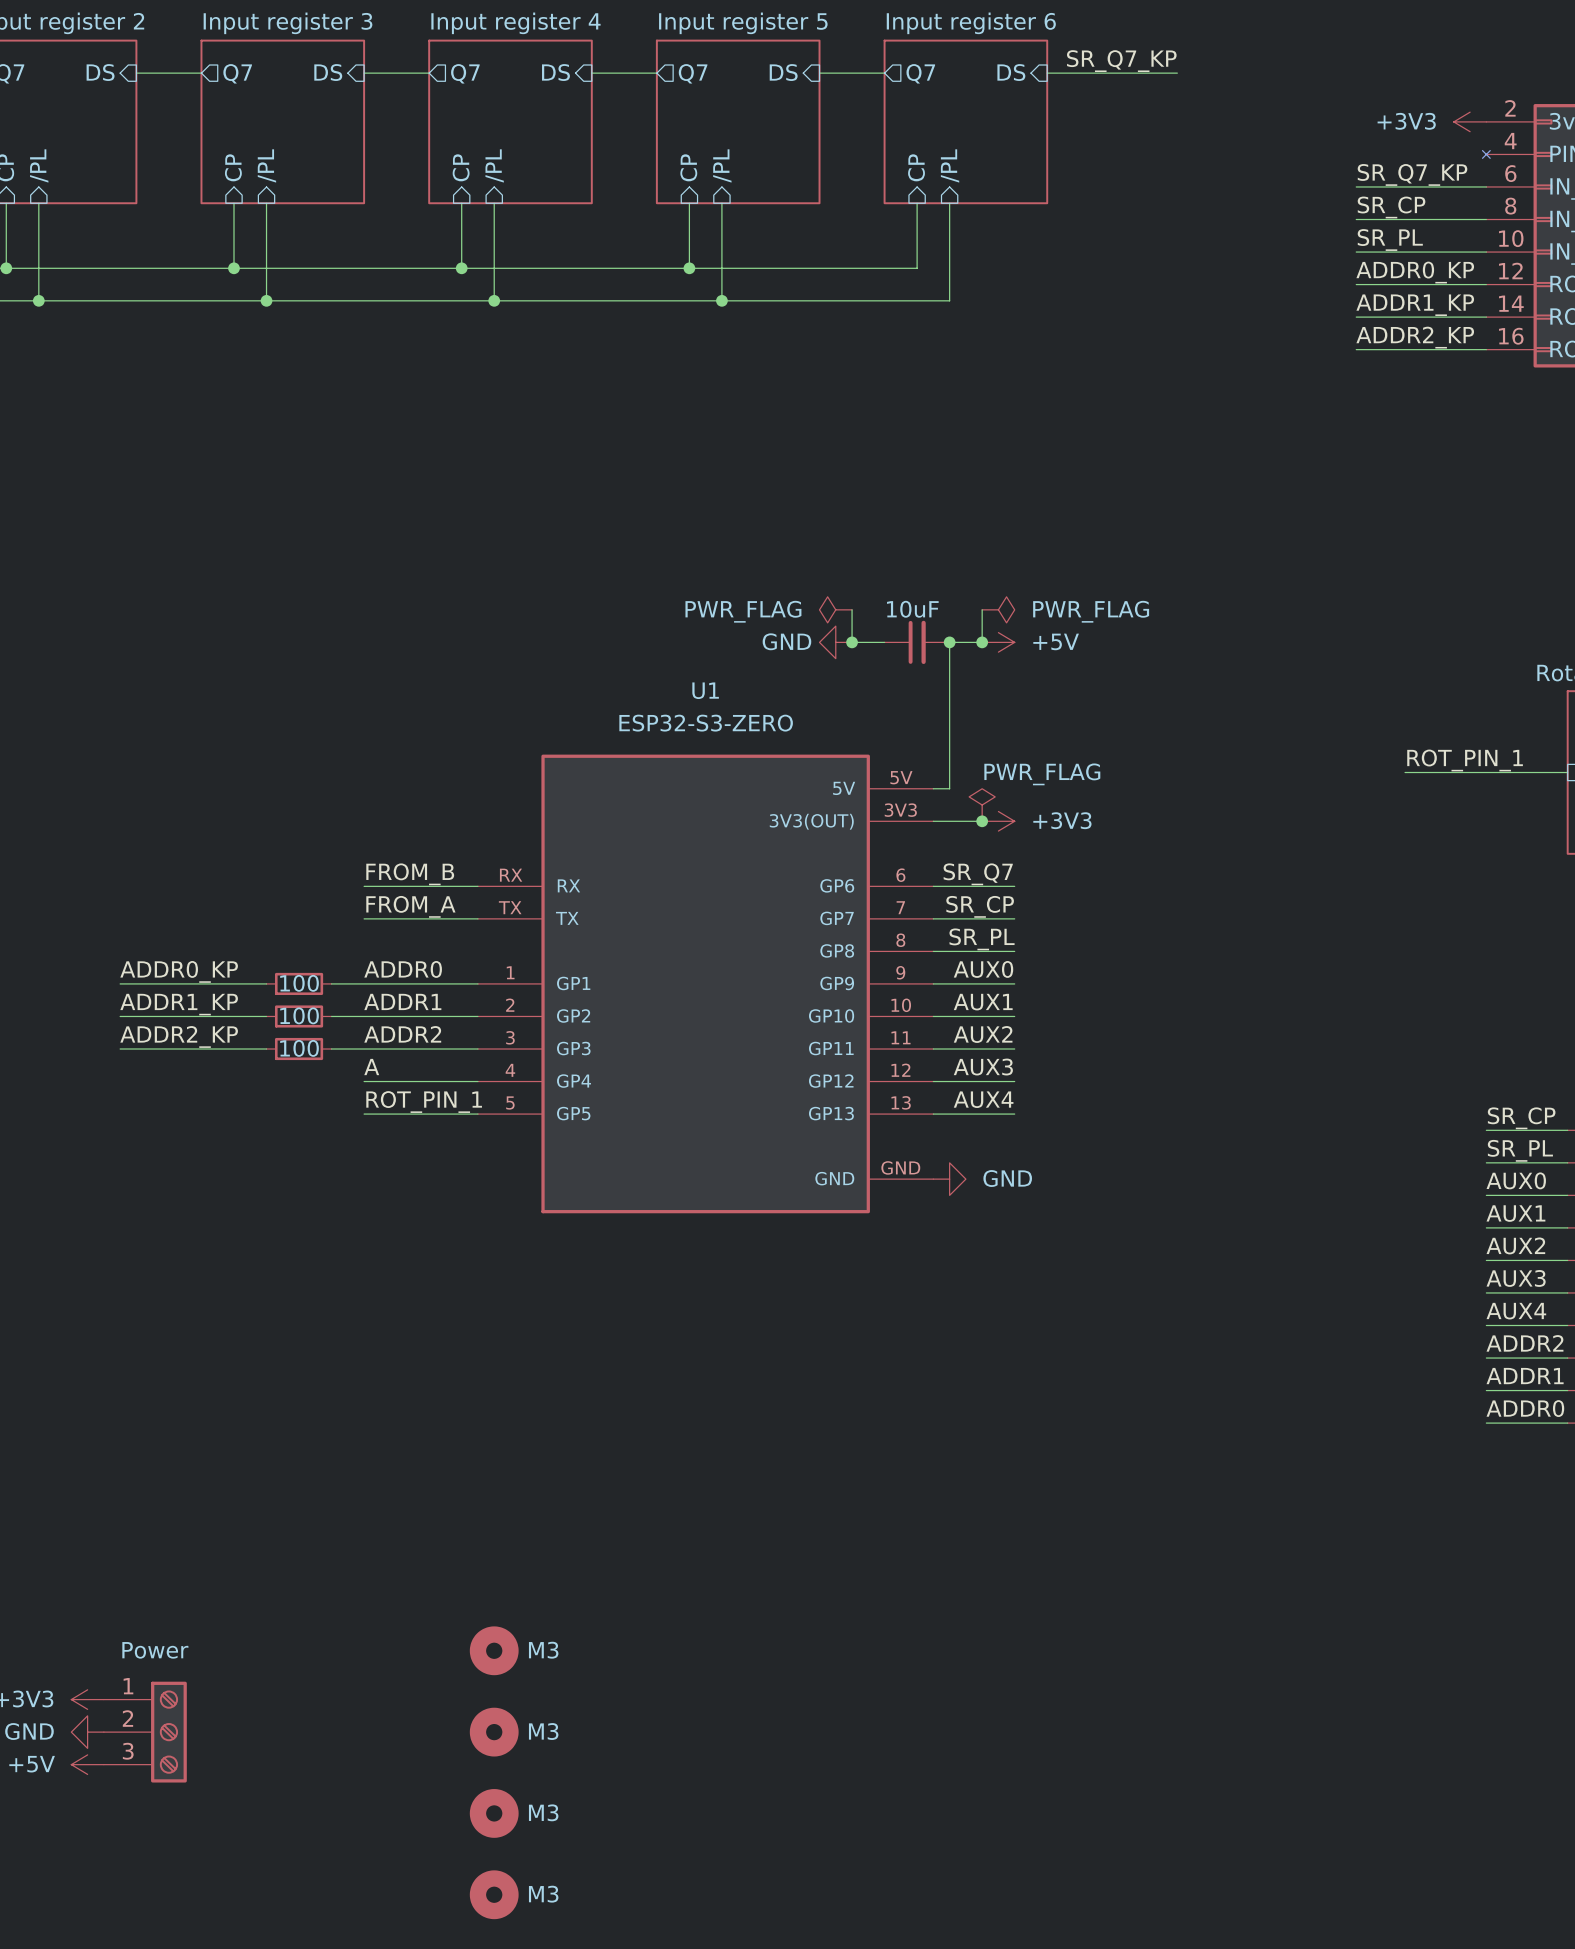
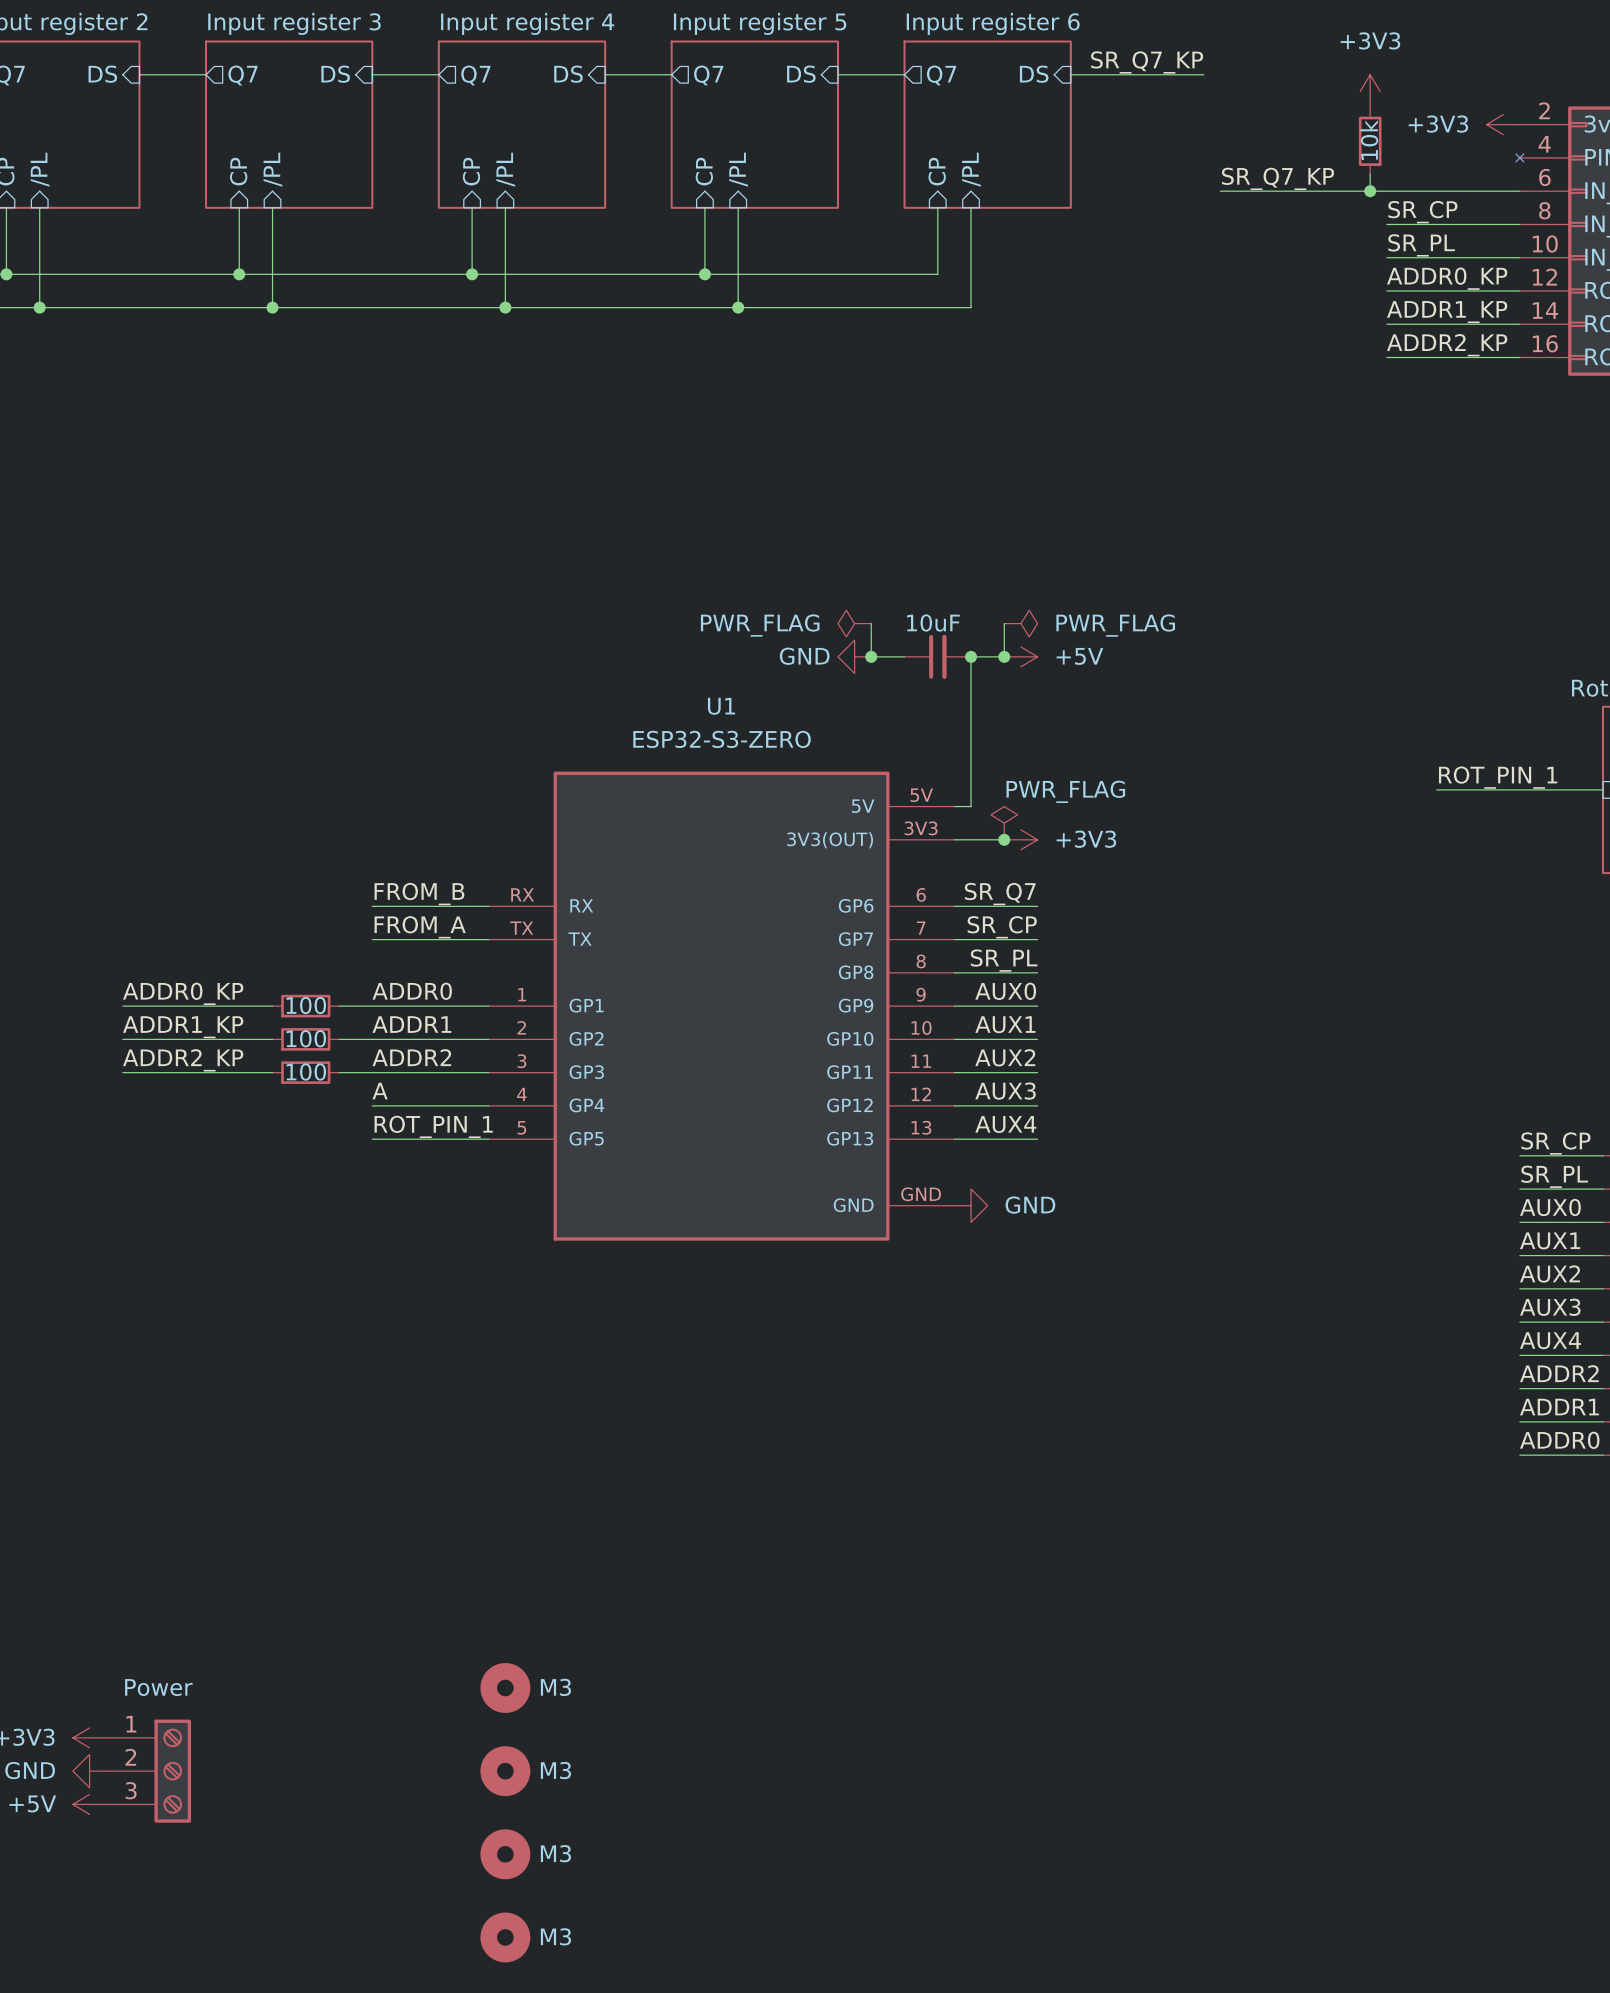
power symbol: none -> +3V3 (1370, 91)
part: none -> 10k (1370, 141)
wire: none -> (1370, 174) (1370, 191)
label position: SR_Q7_KP (1412, 174) -> SR_Q7_KP (1278, 178)
wire: none -> (1220, 191) (1386, 191)
junction: none -> (1370, 191)

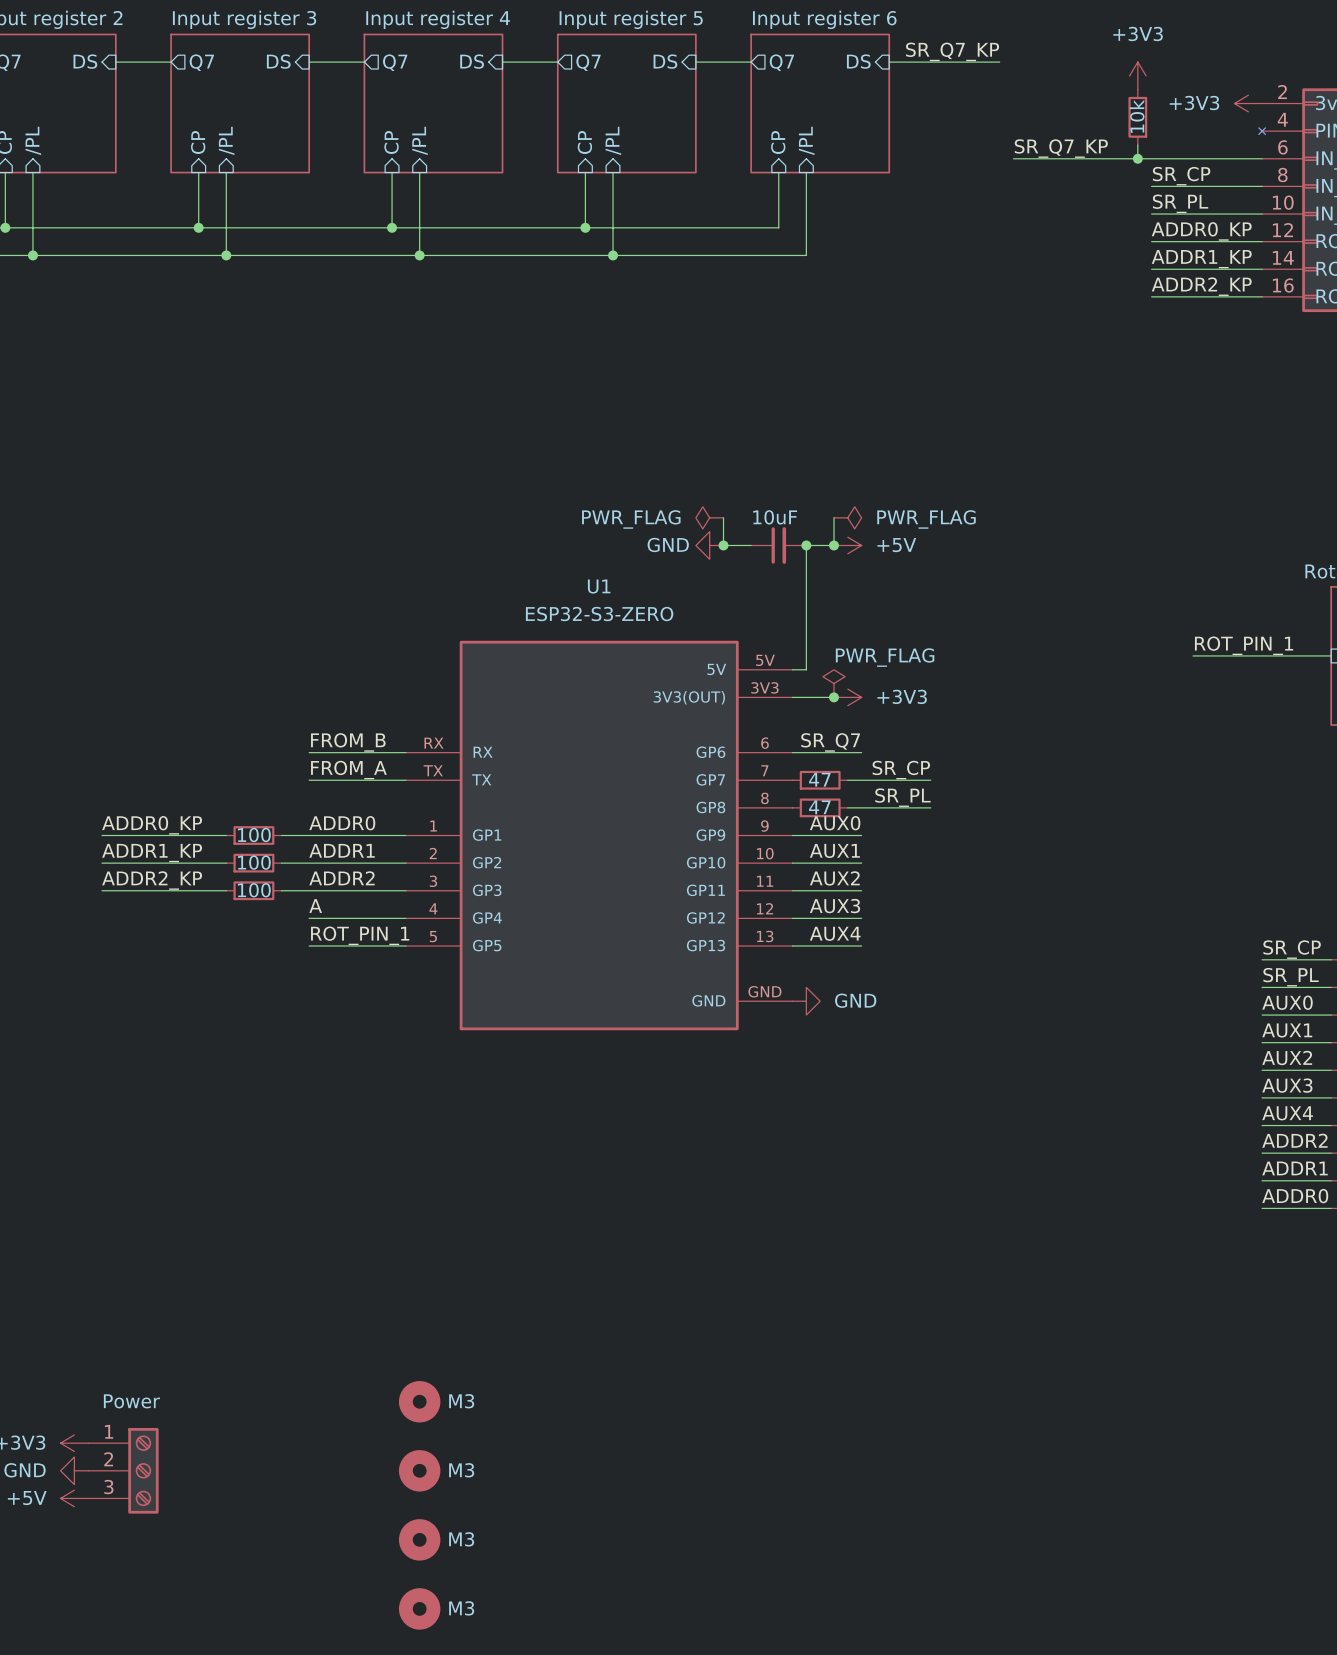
label position: SR_CP (1002, 927) -> SR_CP (901, 770)
wire: (954, 939) (1020, 939) -> none
part: none -> 47 (820, 780)
wire: none -> (861, 780) (930, 780)
label position: SR_PL (1004, 960) -> SR_PL (902, 797)
wire: (954, 972) (1020, 972) -> none
part: none -> 47 (820, 807)
wire: none -> (861, 807) (930, 807)

